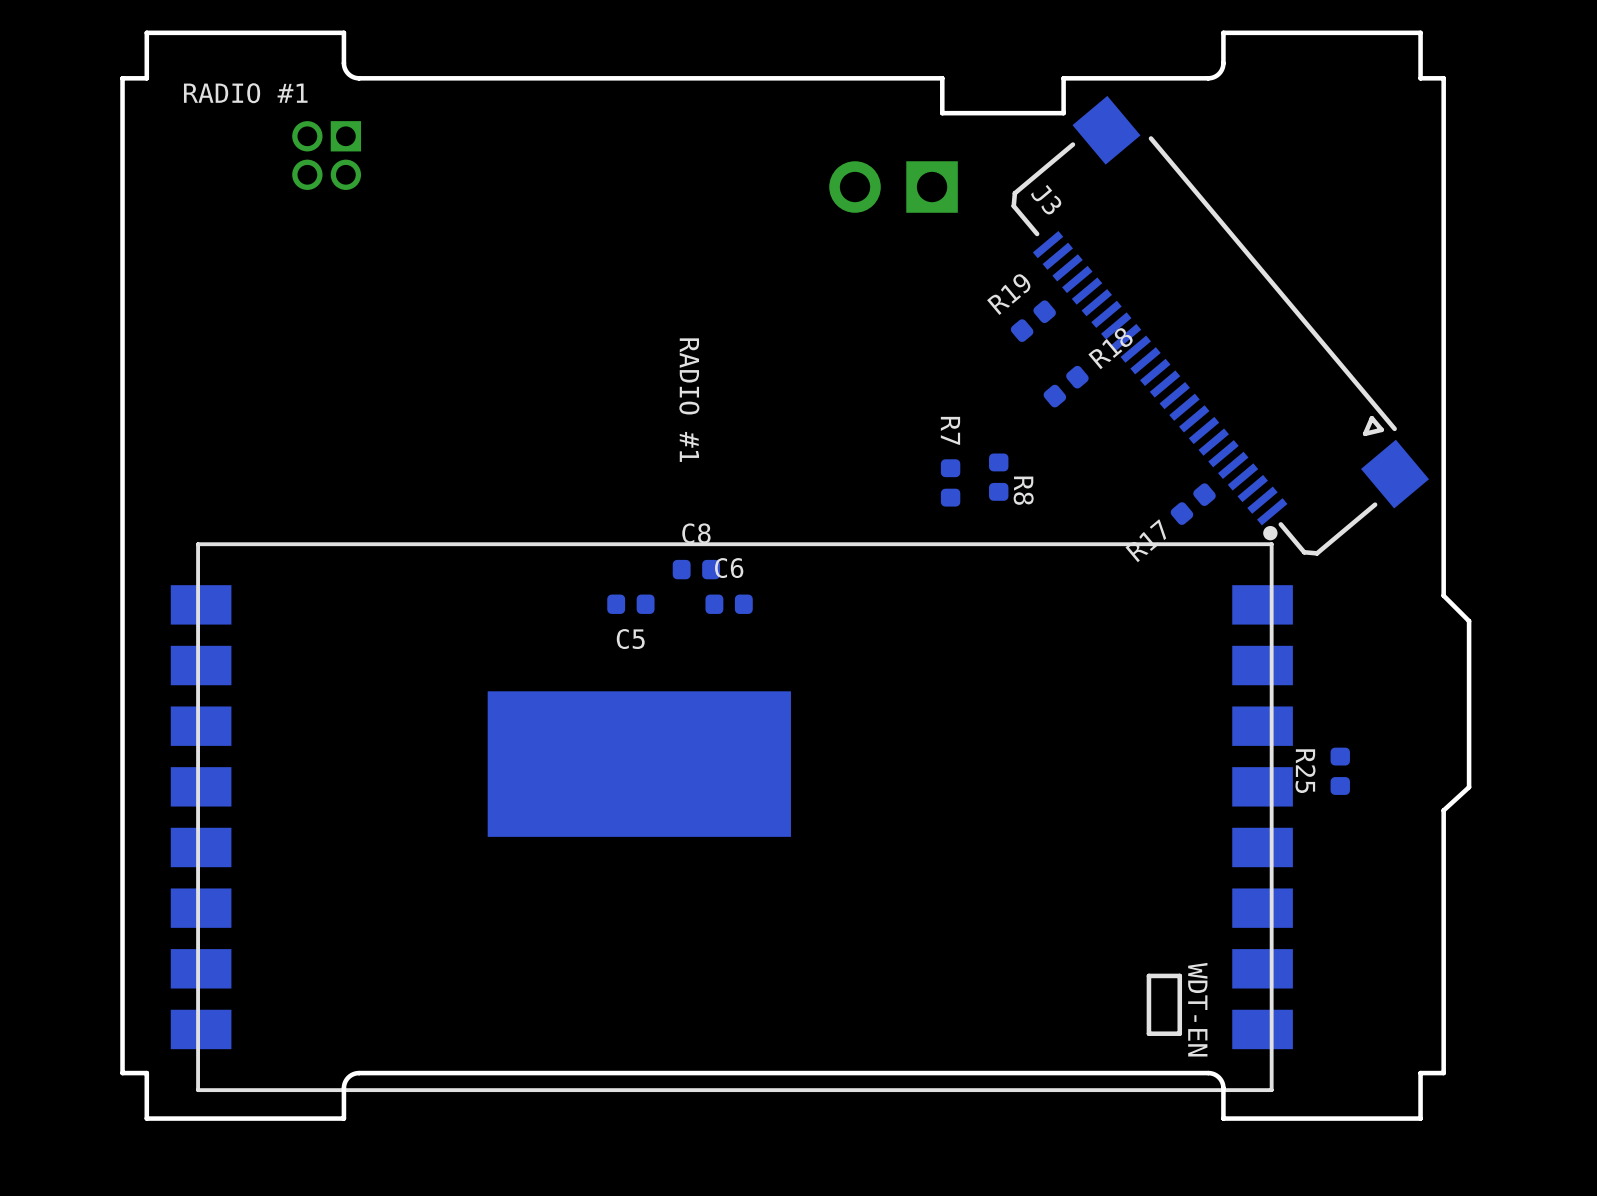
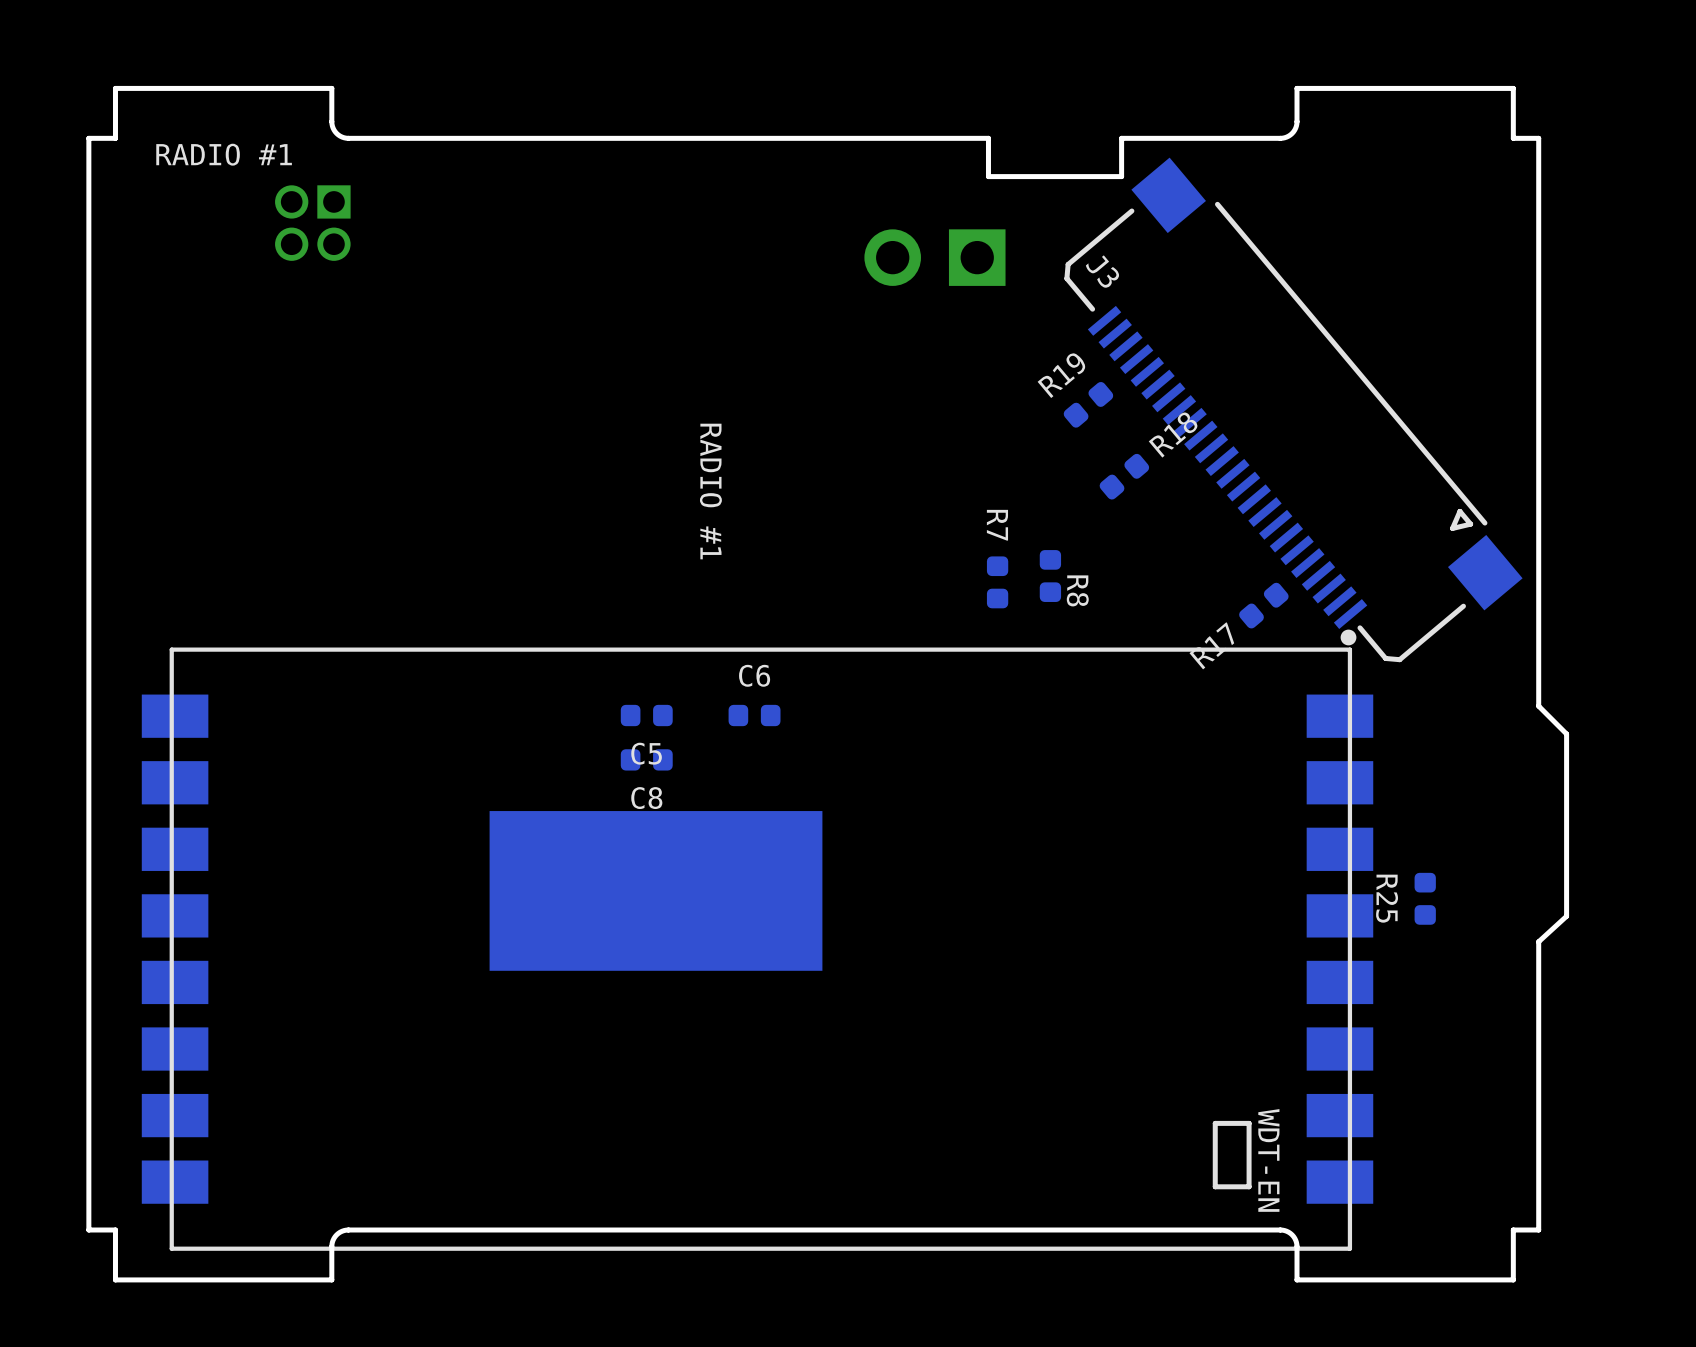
C8 name position: C8 (696, 533) -> C8 (646, 798)
C8 position: (696, 569) -> (646, 759)

